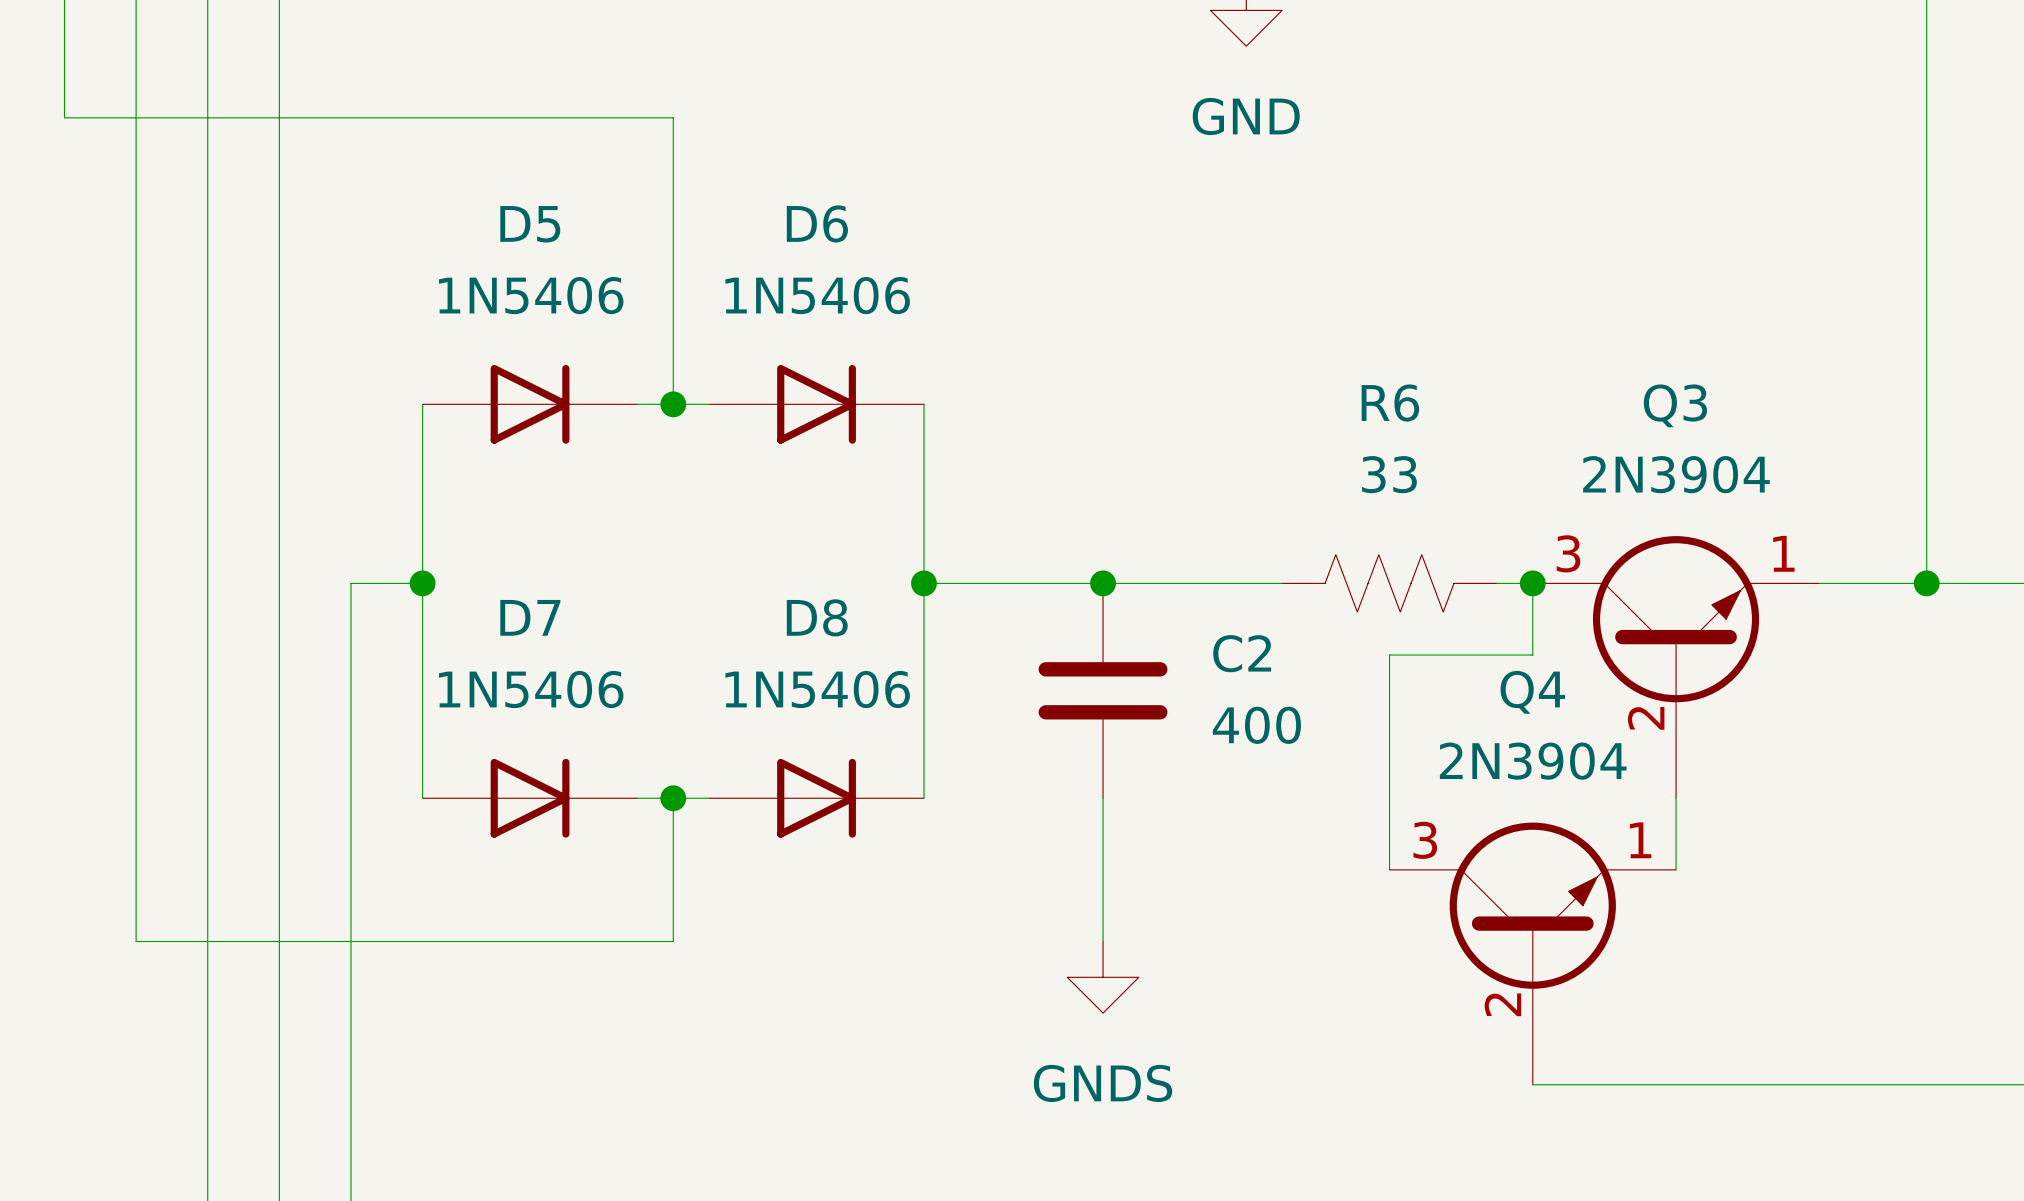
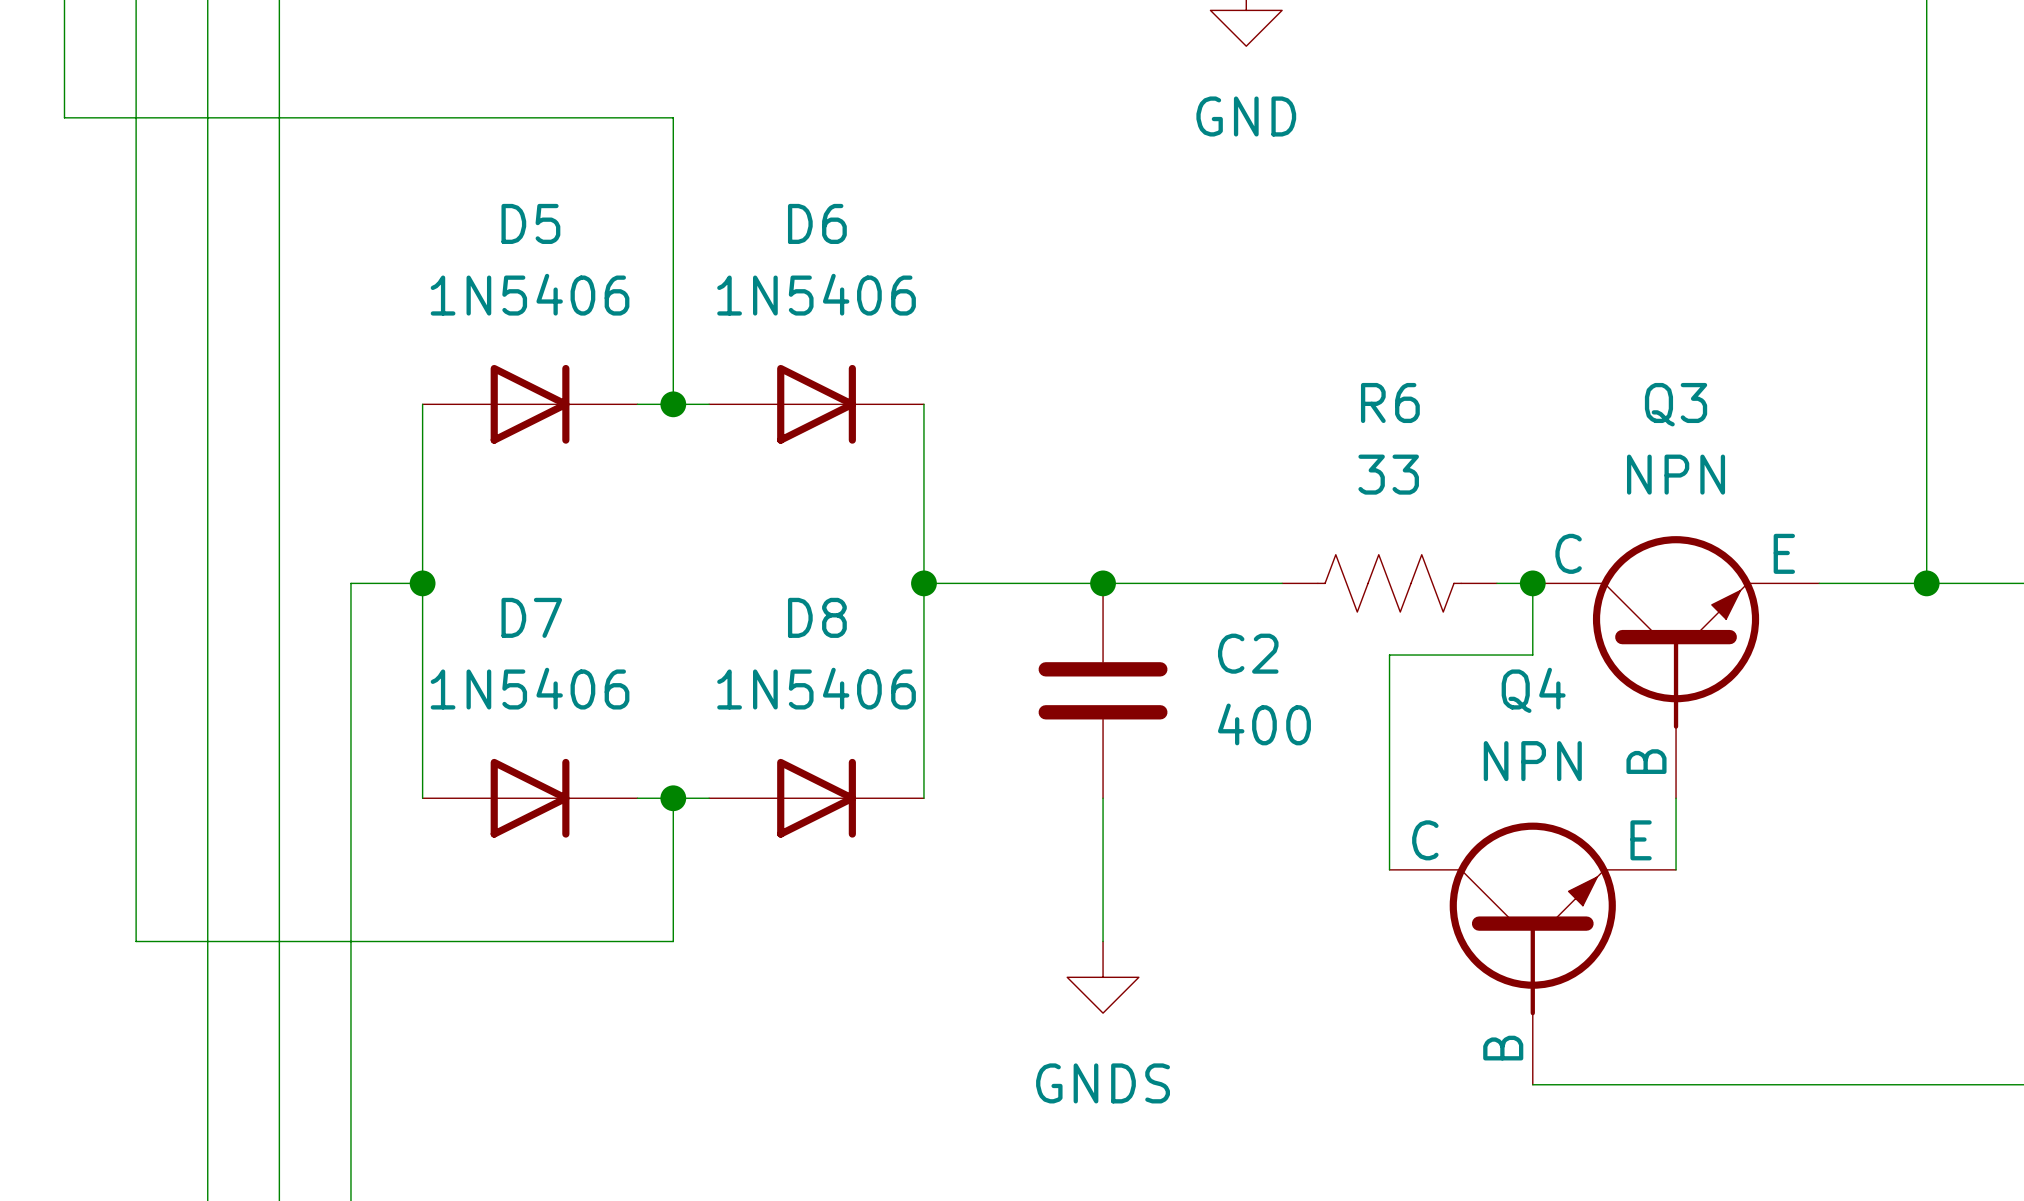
Q3 value: 2N3904 (1676, 474) -> NPN (1676, 474)
Q3 symbol: [1532, 536, 1820, 799] -> [1532, 536, 1820, 799]
Q4 value: 2N3904 (1533, 761) -> NPN (1532, 761)
Q4 symbol: [1389, 822, 1677, 1085] -> [1389, 822, 1677, 1085]

